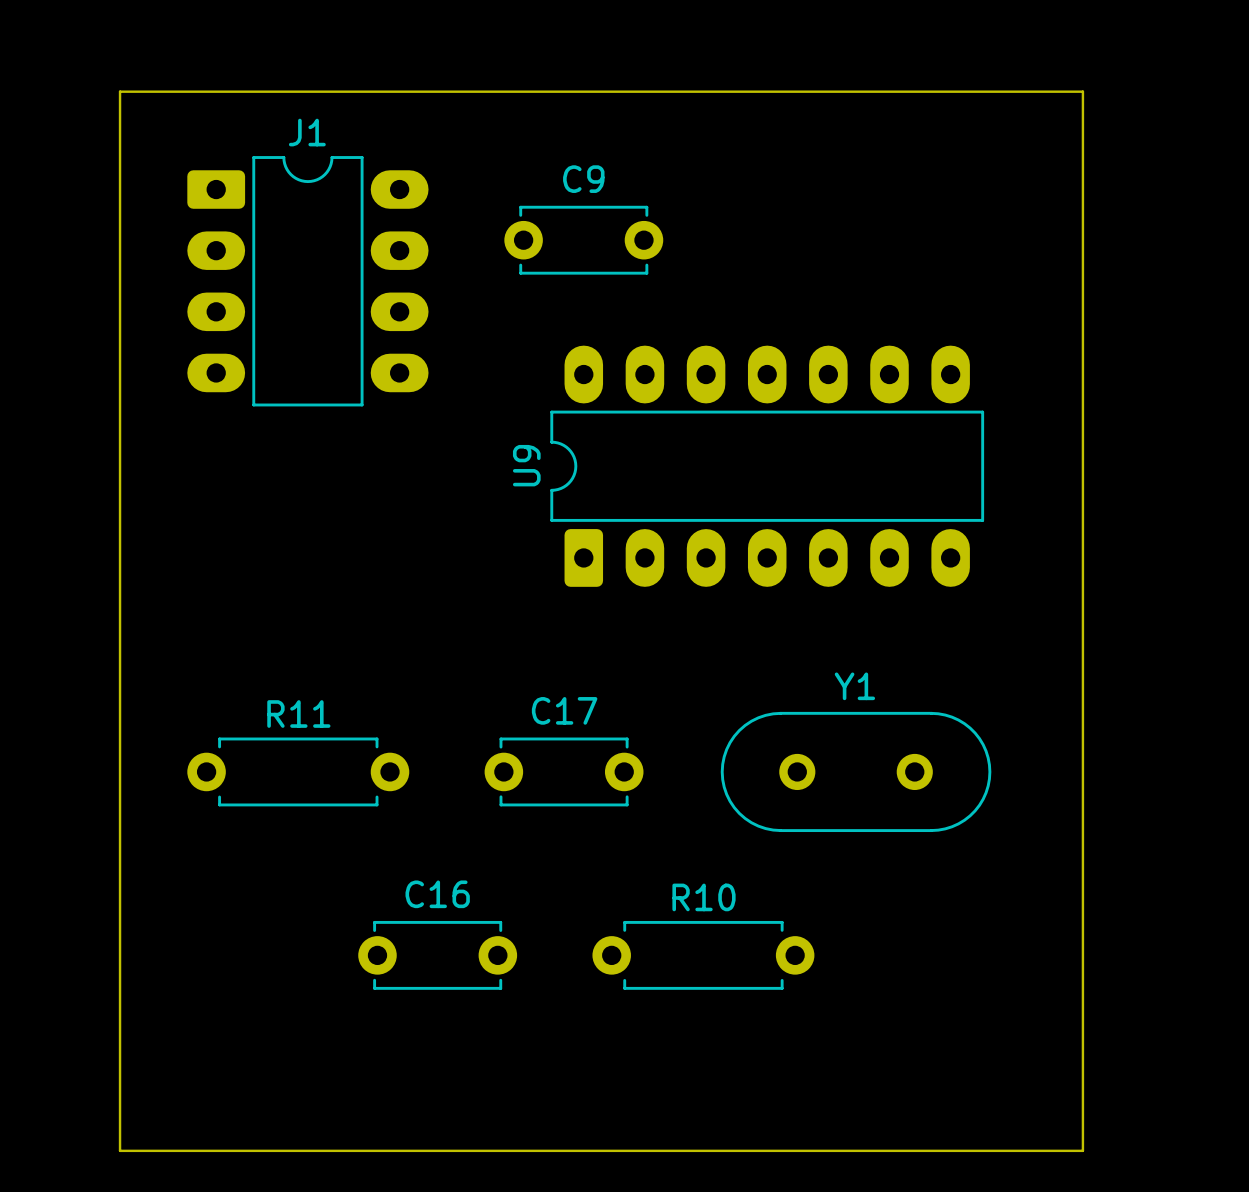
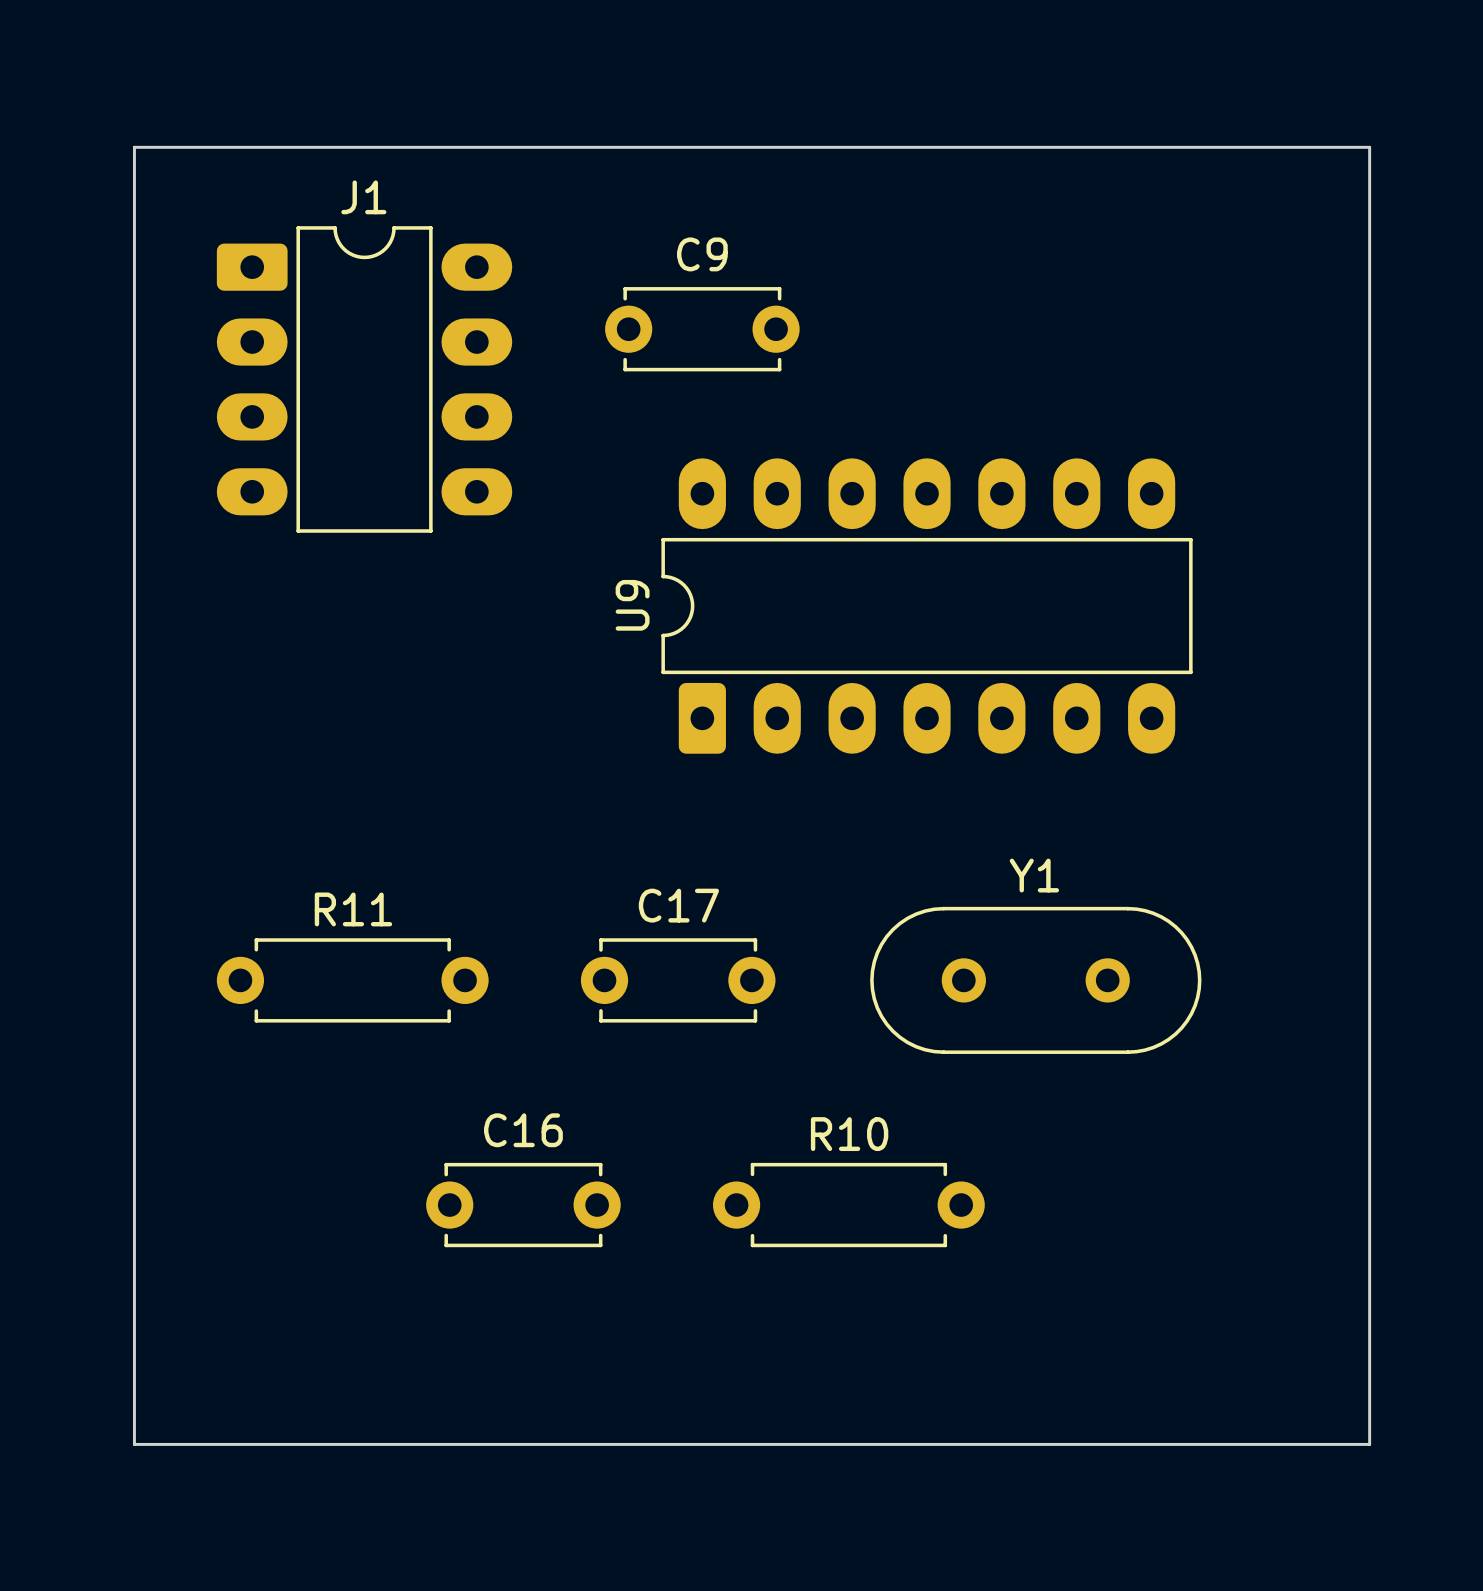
board edge: (1082, 91) (1082, 1150) -> (1313, 147) (1369, 147) (1369, 1444) (1313, 1444)

